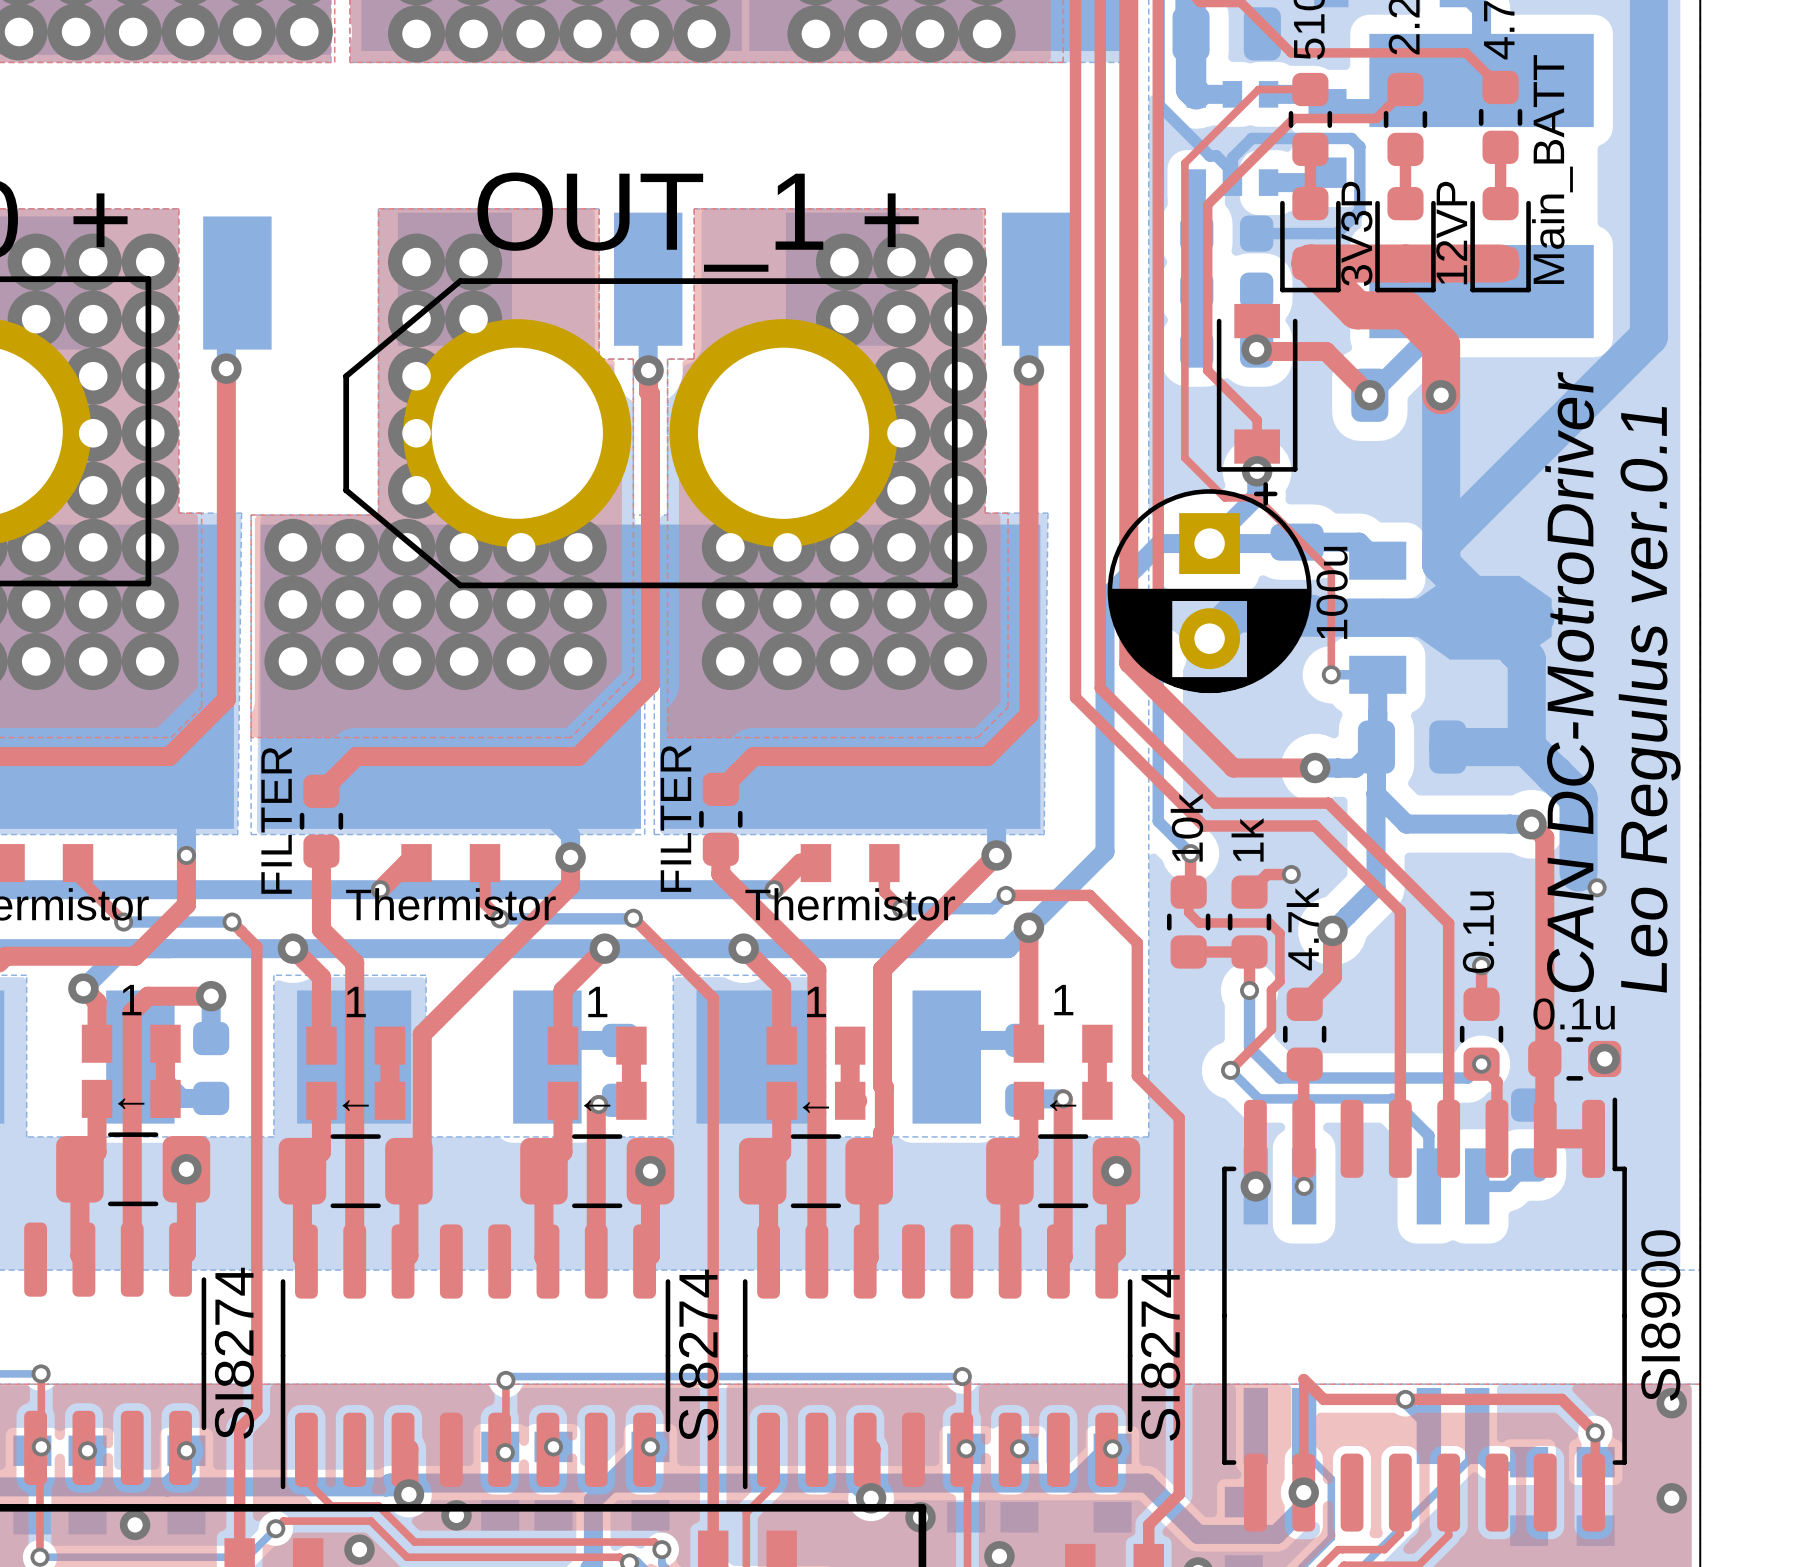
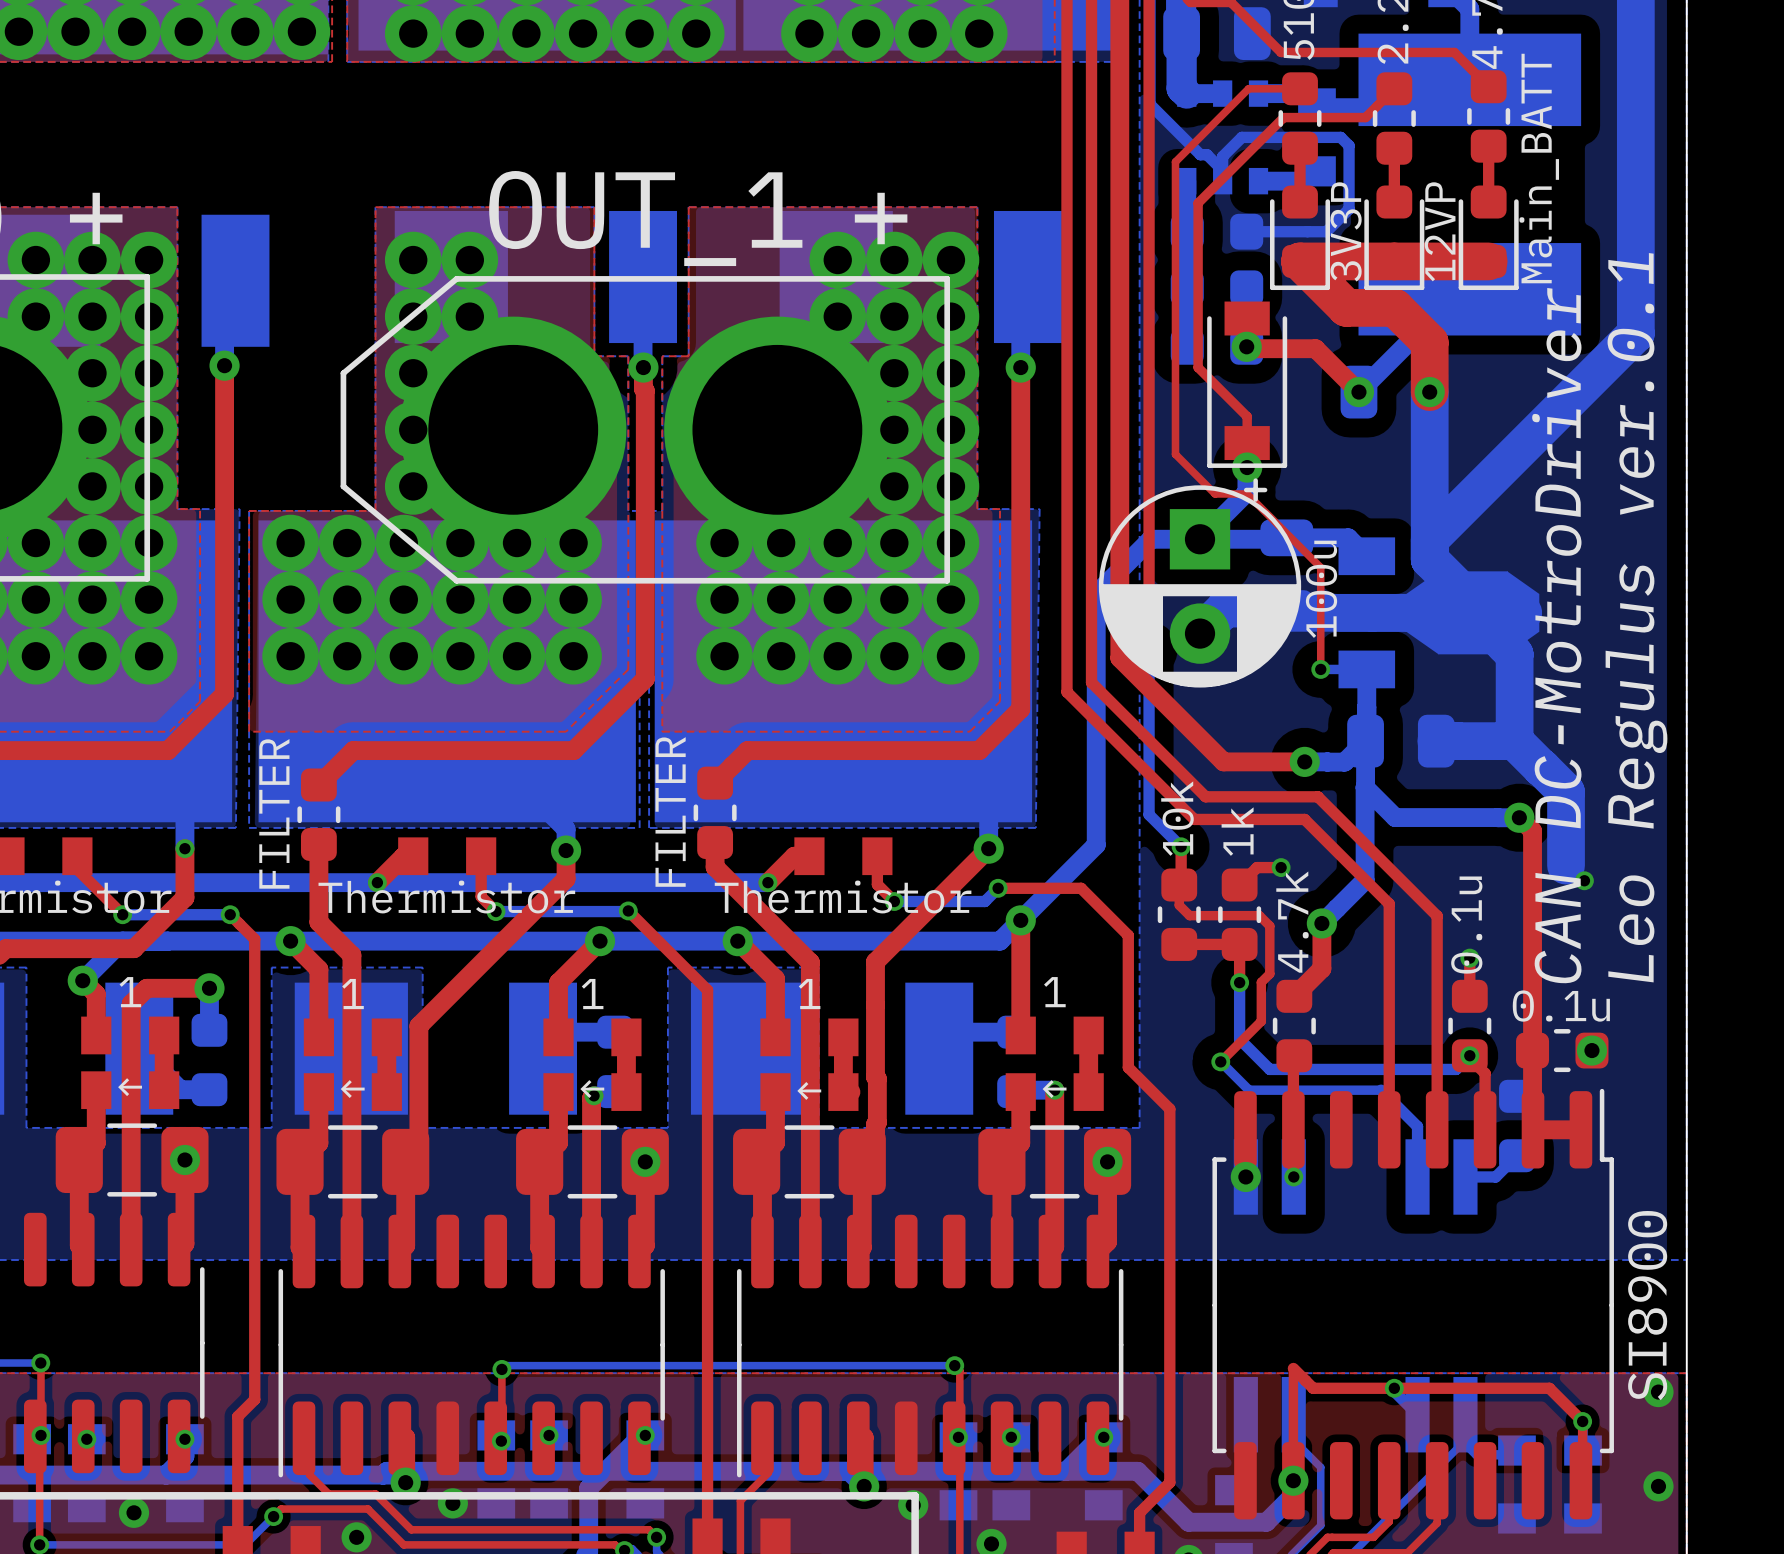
part value: SI8274 (234, 1353) -> none
part value: SI8274 (698, 1355) -> none
part value: SI8274 (1160, 1355) -> none

